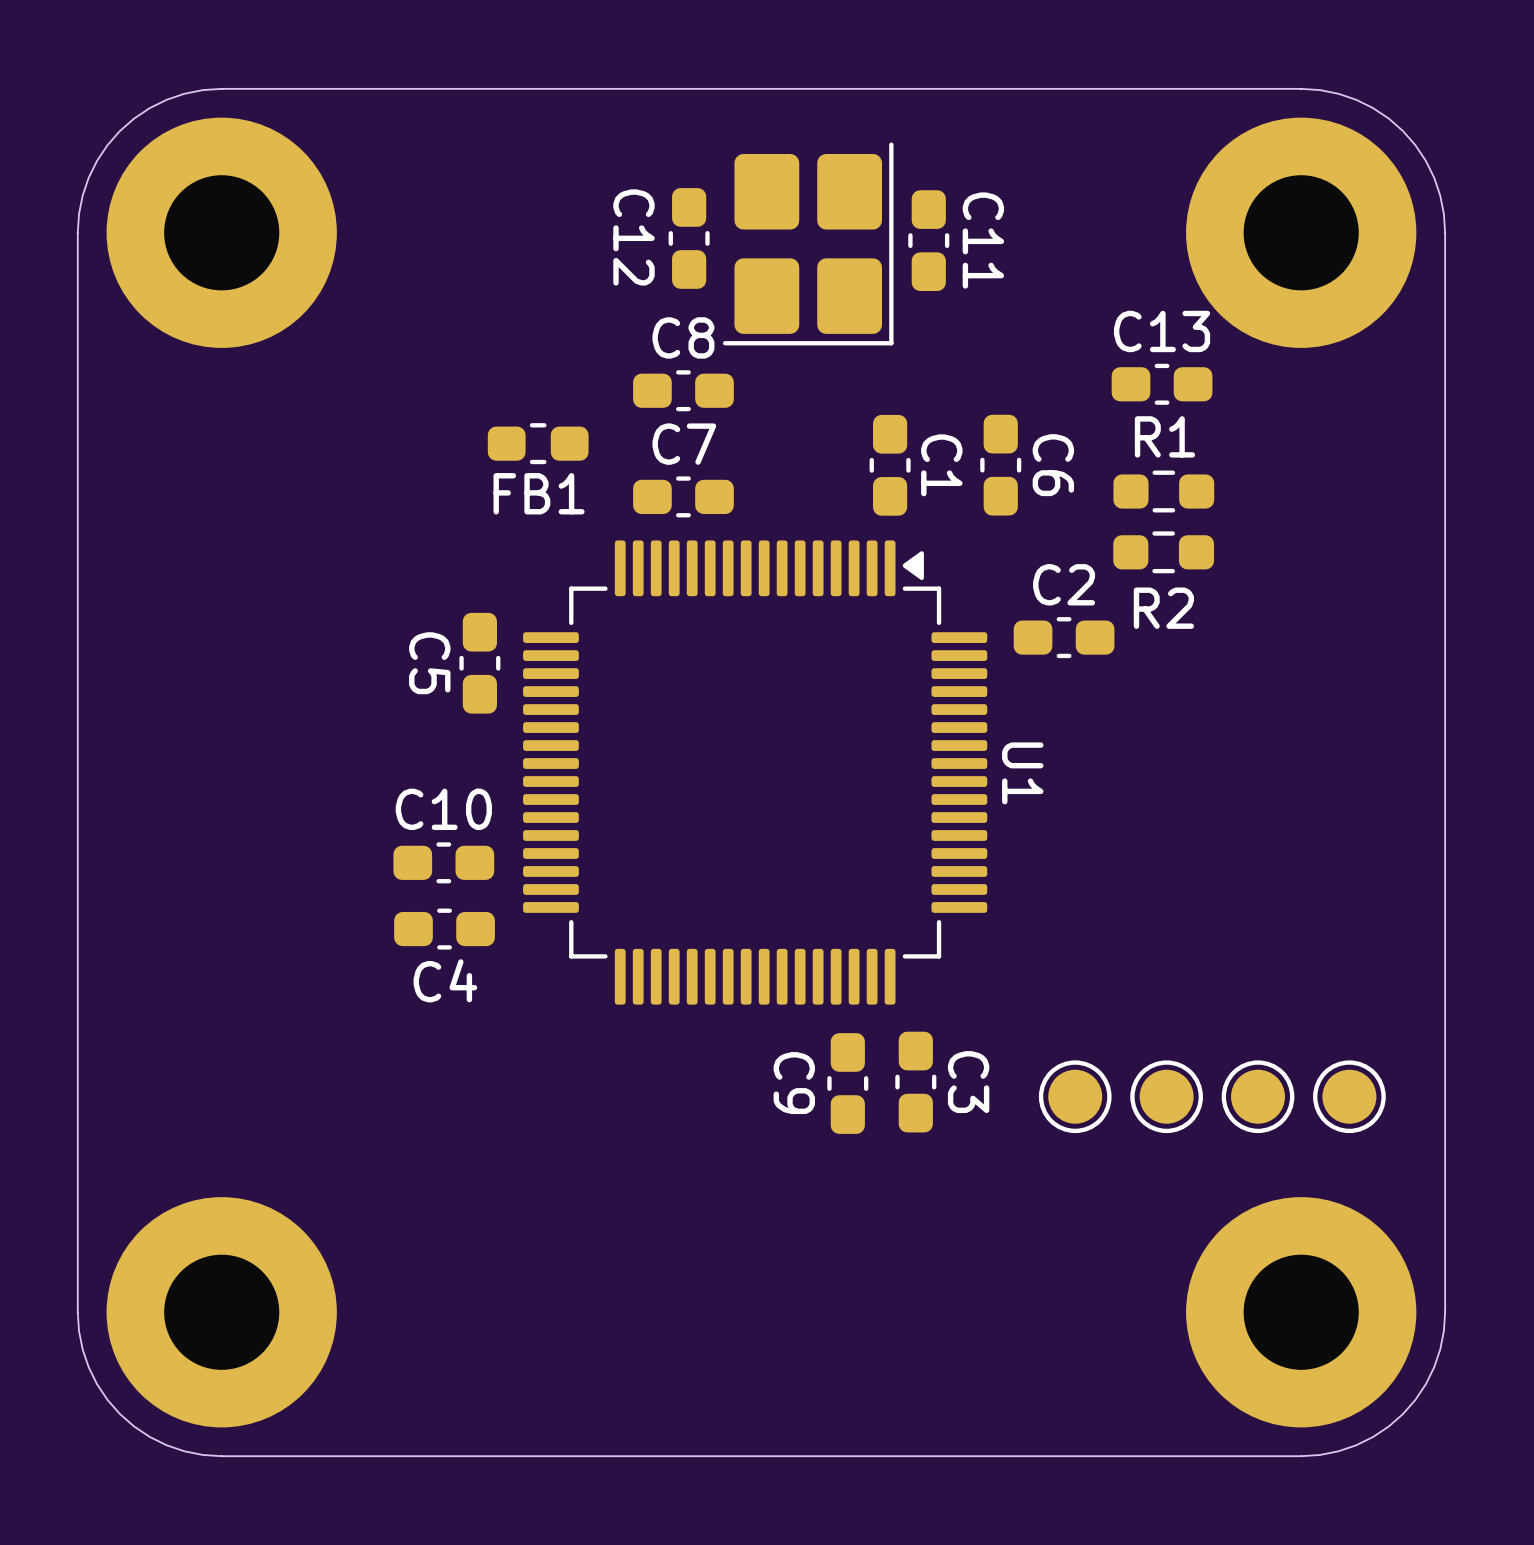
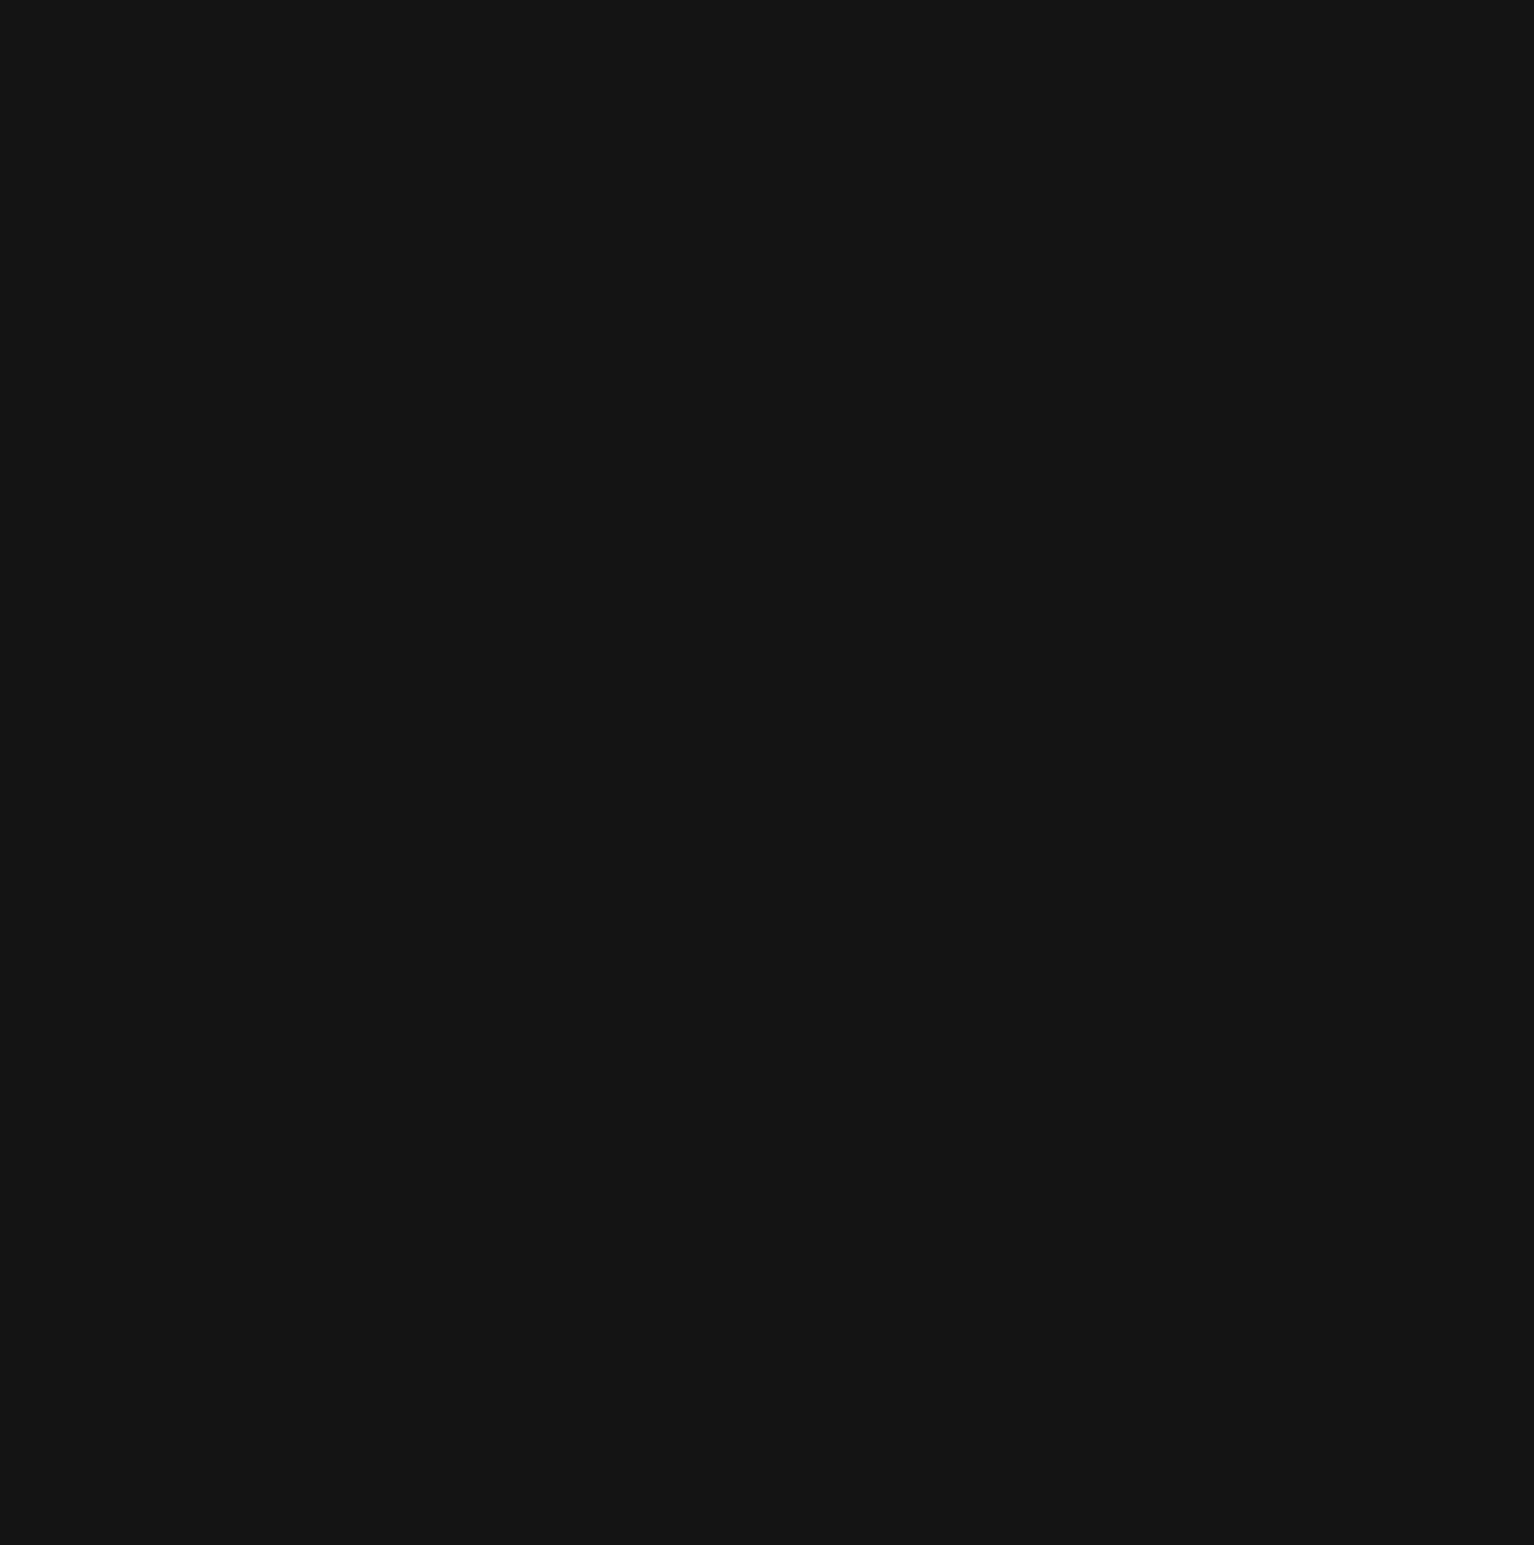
board edge: (1301, 88) (221, 88) (202, 90) (166, 99) (134, 118) (119, 131) (97, 160) (88, 177) (82, 195) (77, 232) (77, 1312) (79, 1331) (88, 1367) (107, 1399) (119, 1414) (149, 1436) (166, 1445) (184, 1451) (221, 1456) (1301, 1456) (1338, 1451) (1356, 1445) (1388, 1426) (1402, 1414) (1425, 1384) (1434, 1367) (1443, 1331) (1445, 1312) (1443, 214) (1440, 195) (1425, 160) (1402, 131) (1373, 108) (1356, 99) (1319, 90) (1301, 88) -> none
part: (221, 232) -> none
part: (1301, 232) -> none
C12: (689, 238) -> none
C11: (928, 240) -> none
part: (808, 243) -> none
C13: (1162, 384) -> none
C8: (683, 390) -> none
FB1: (538, 443) -> none
C1: (890, 465) -> none
C6: (1000, 465) -> none
R1: (1163, 491) -> none
C7: (683, 496) -> none
R2: (1163, 552) -> none
C2: (1064, 637) -> none
C5: (479, 663) -> none
U1: (755, 772) -> none
C10: (443, 862) -> none
C4: (444, 929) -> none
C3: (915, 1082) -> none
C9: (847, 1083) -> none
part: (1075, 1096) -> none
part: (1166, 1096) -> none
part: (1258, 1096) -> none
part: (1349, 1096) -> none
part: (221, 1312) -> none
part: (1301, 1312) -> none

